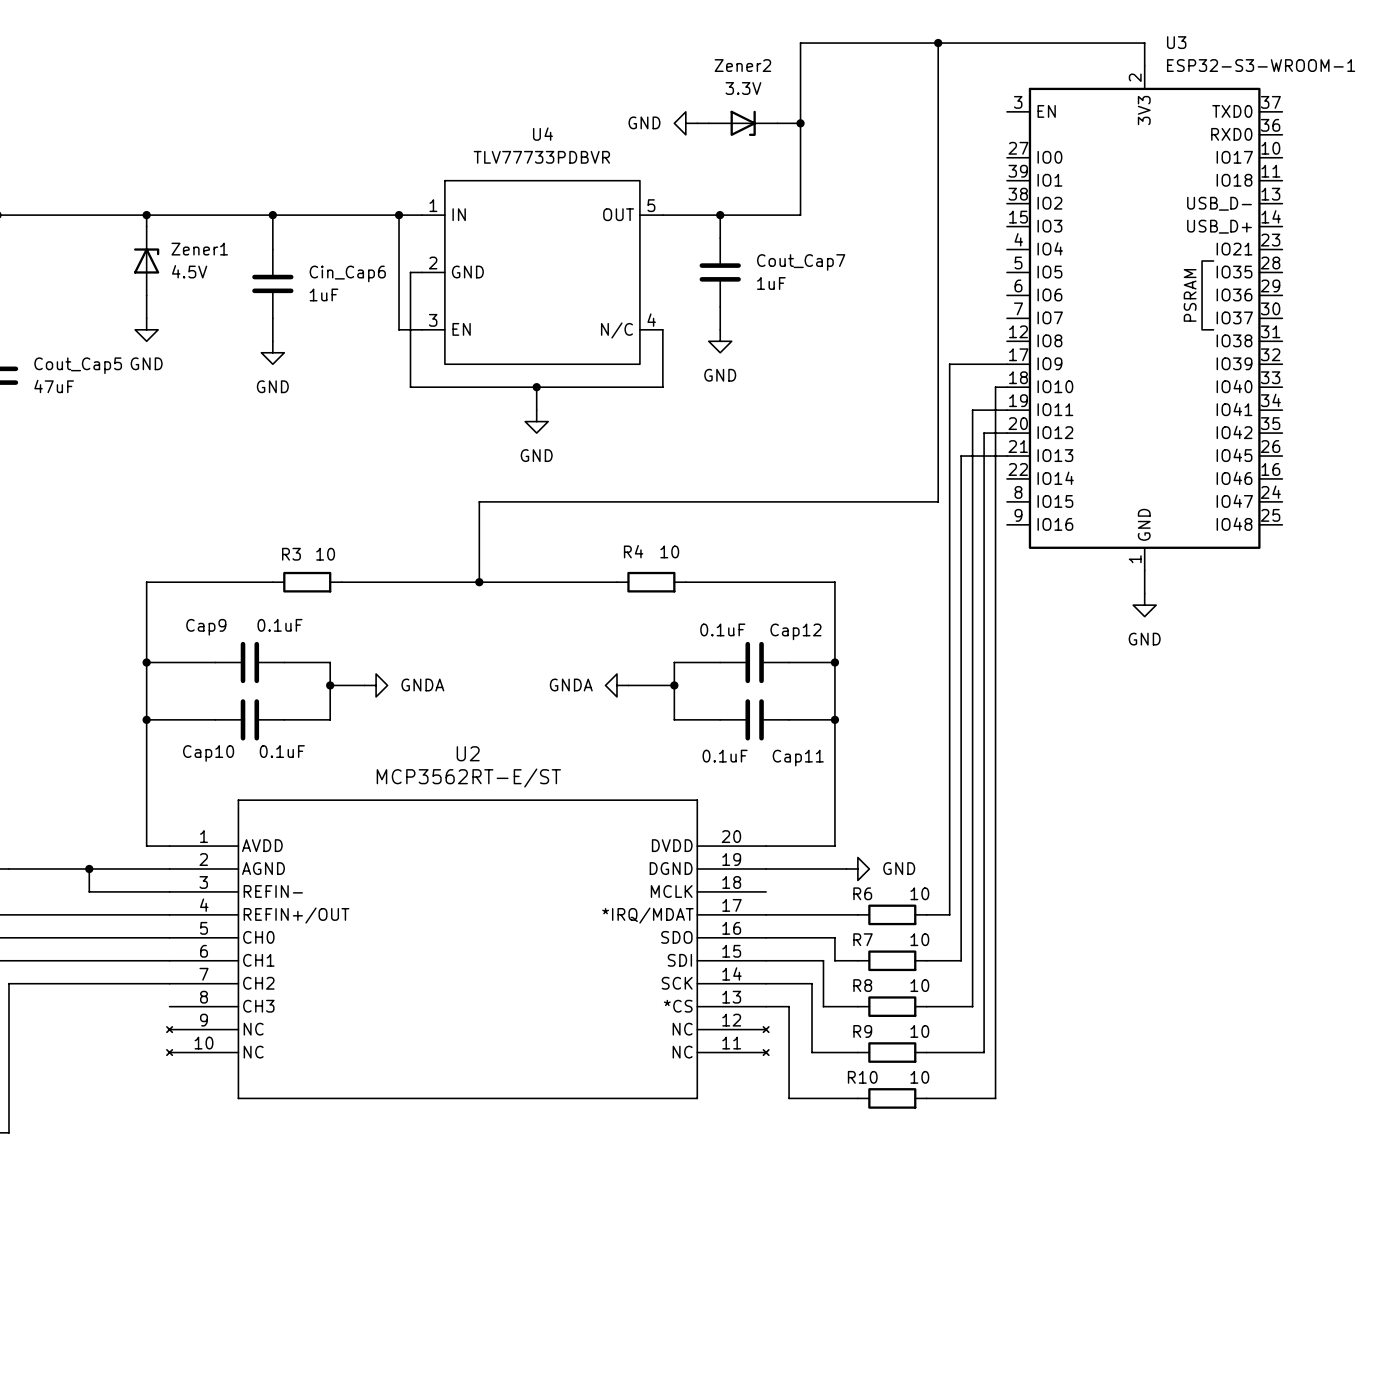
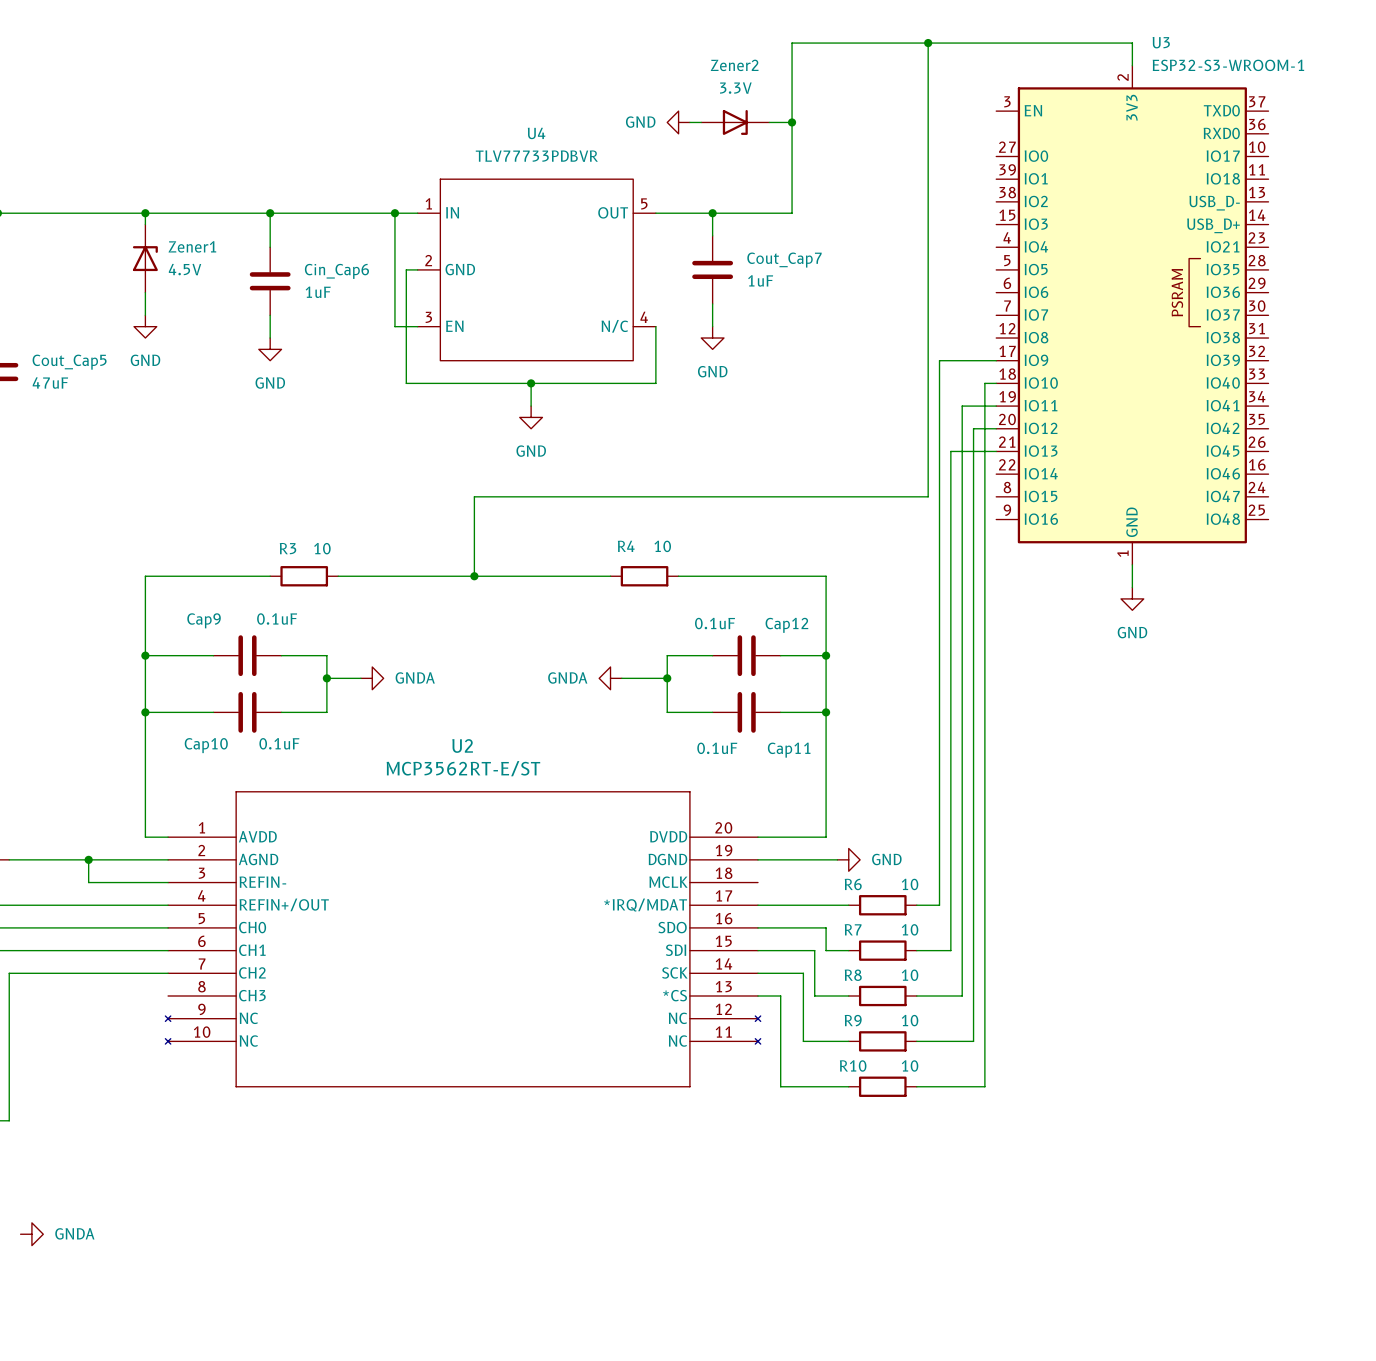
power symbol: none -> GNDA (31, 1234)

